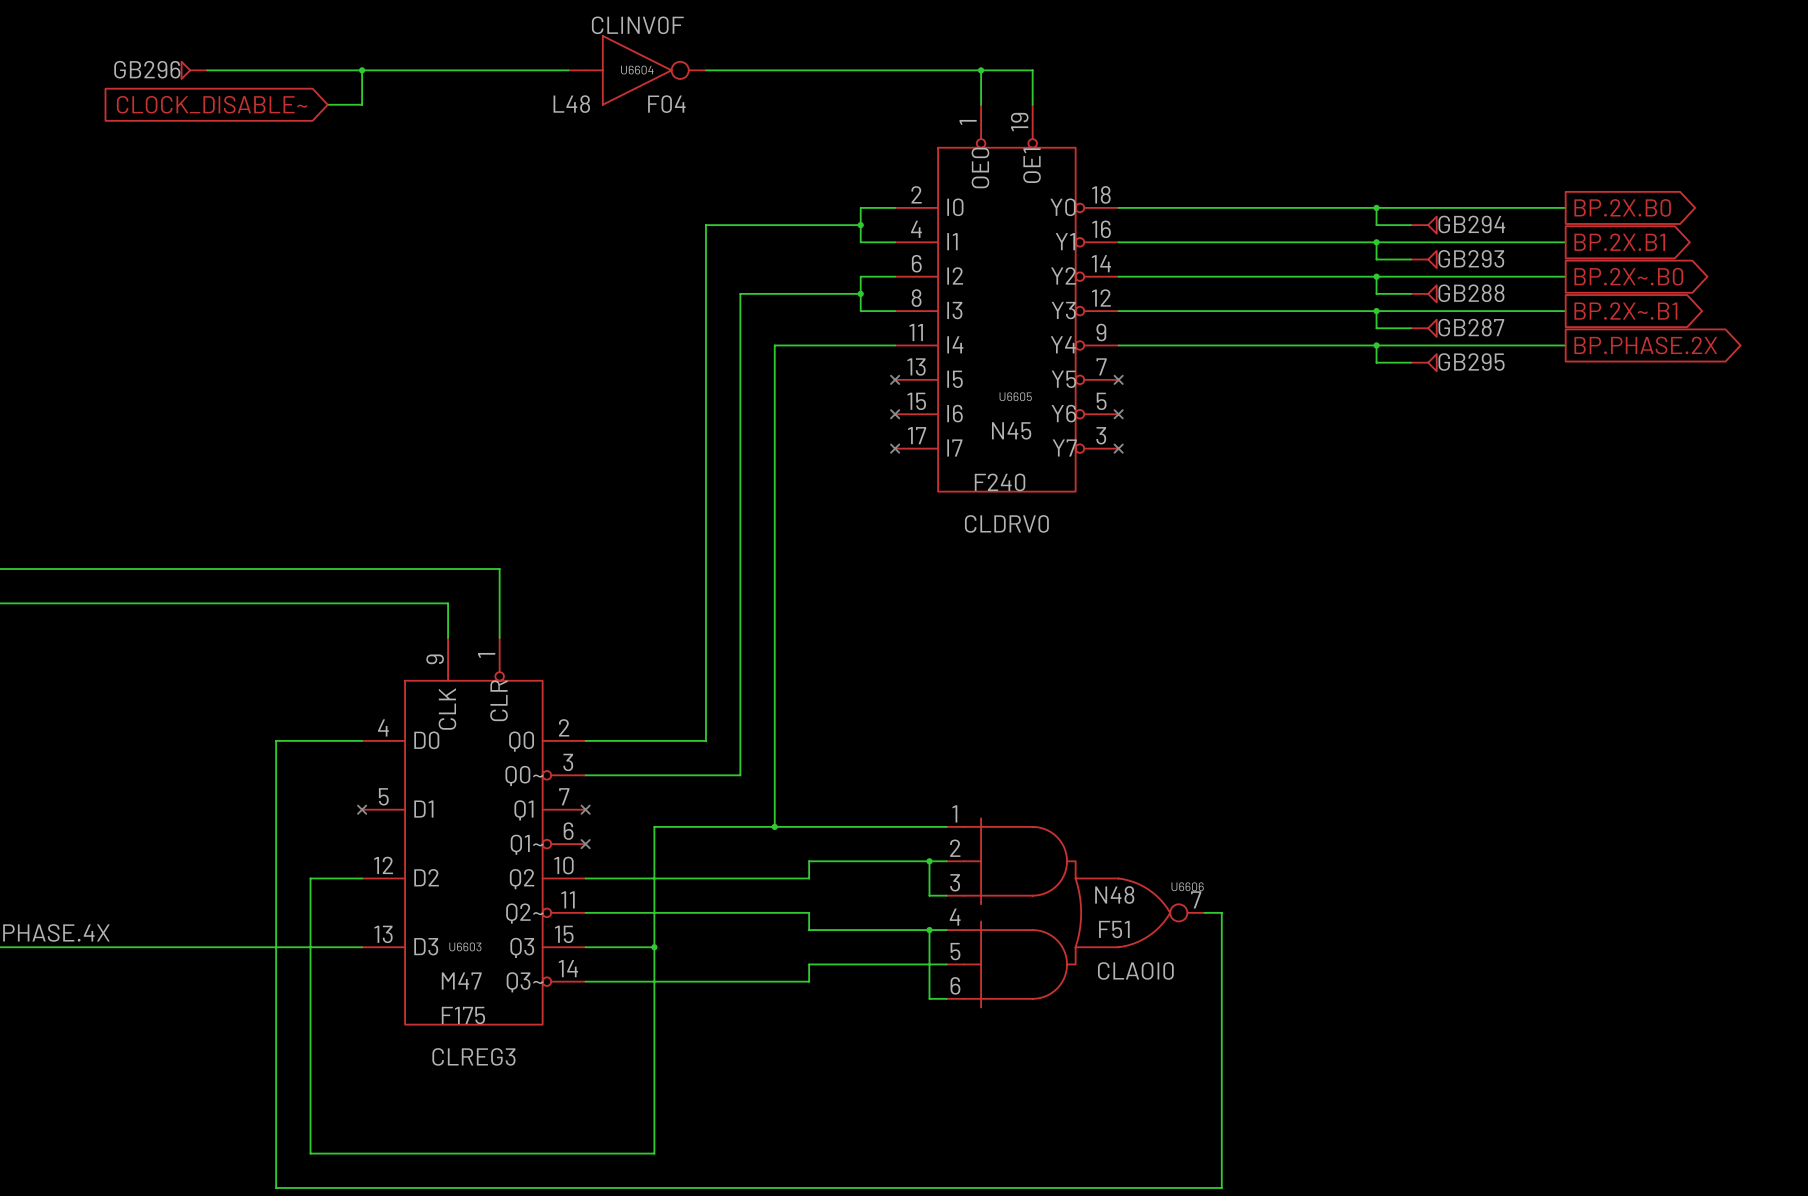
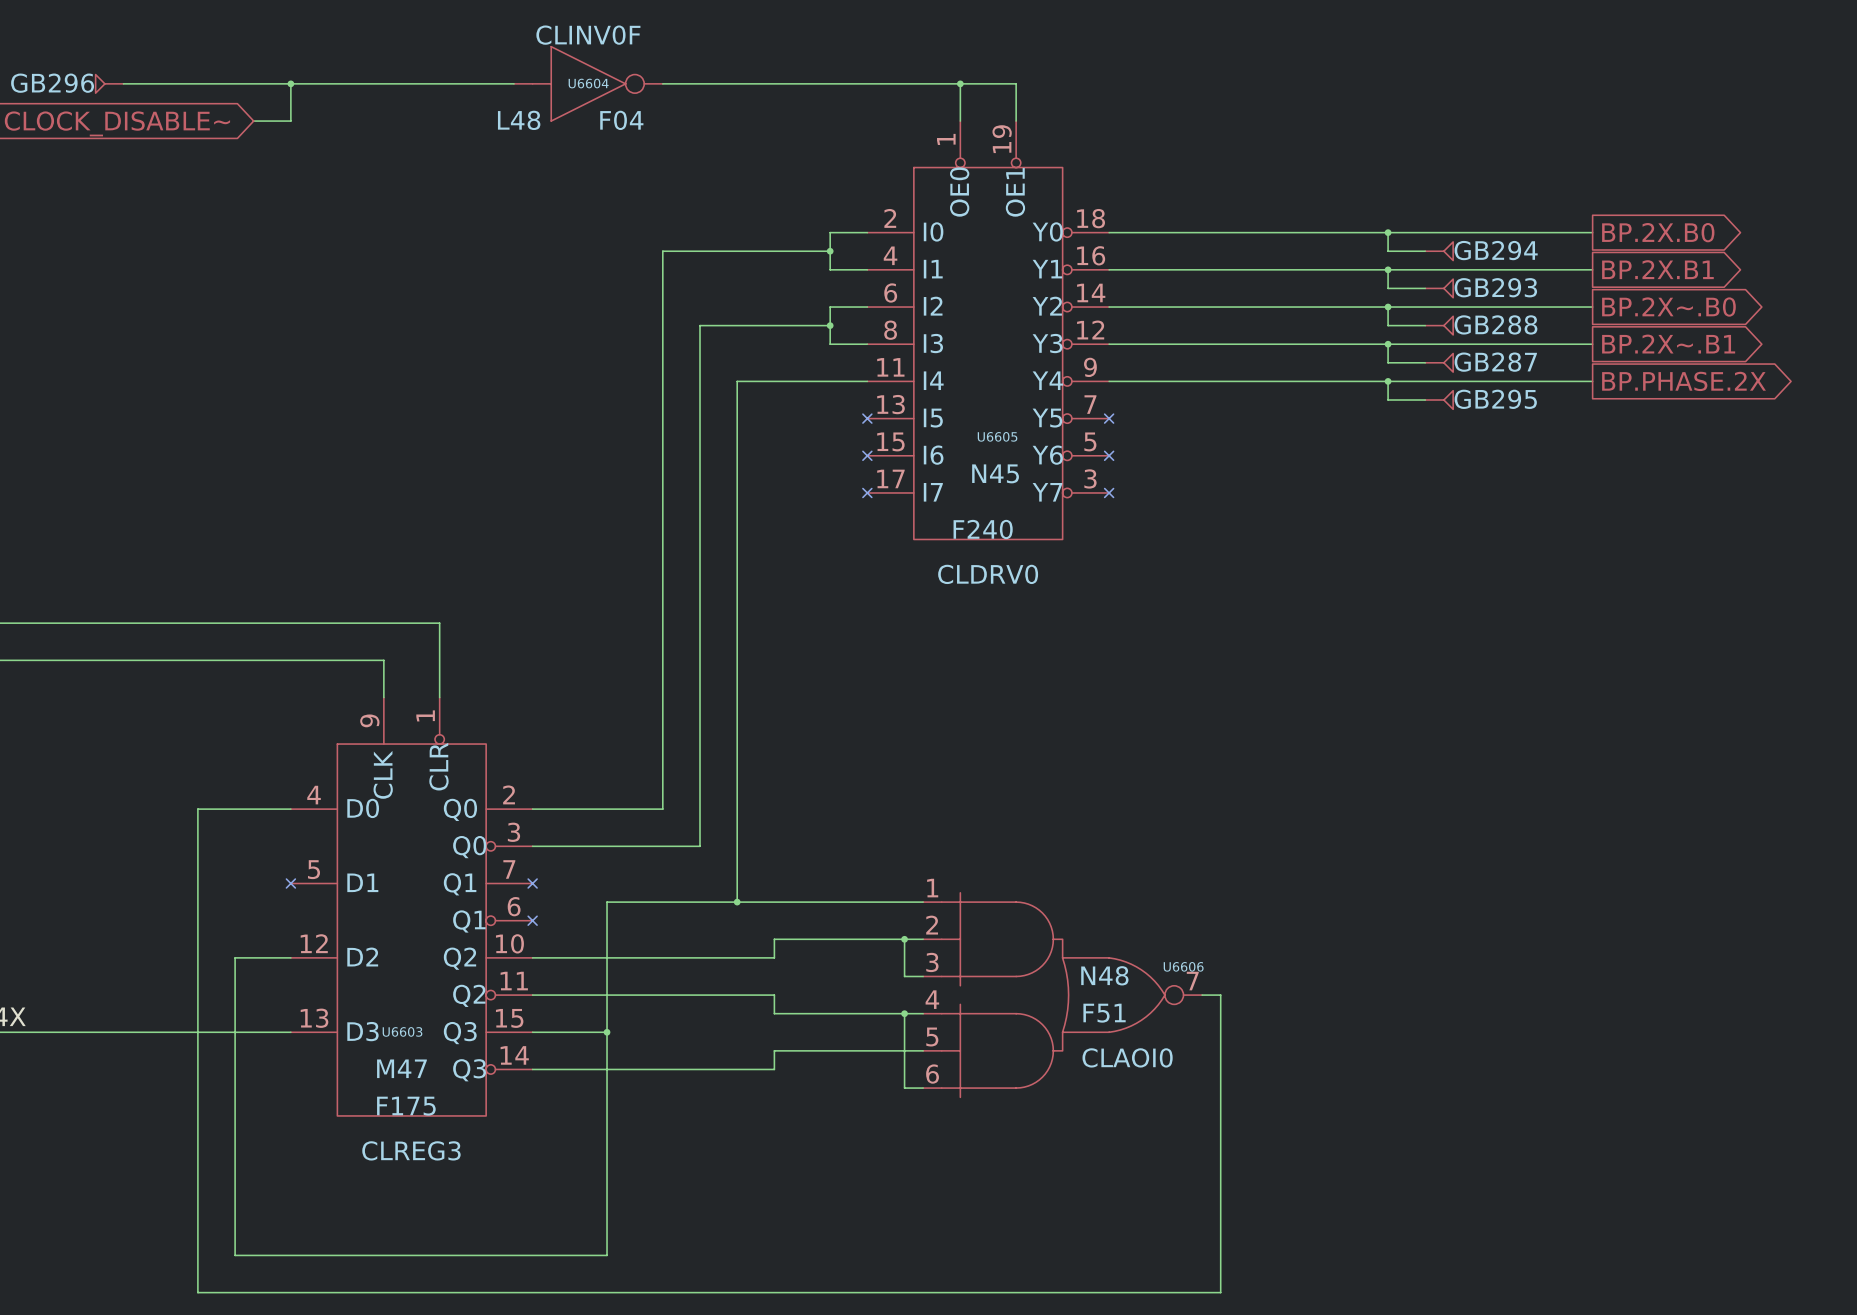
U6603 pin name: Q0~ (524, 775) -> Q0 (469, 847)
U6603 pin name: Q1~ (527, 844) -> Q1 (469, 921)
U6603 pin name: Q2~ (524, 913) -> Q2 (469, 995)
U6603 pin name: Q3~ (525, 982) -> Q3 (469, 1070)

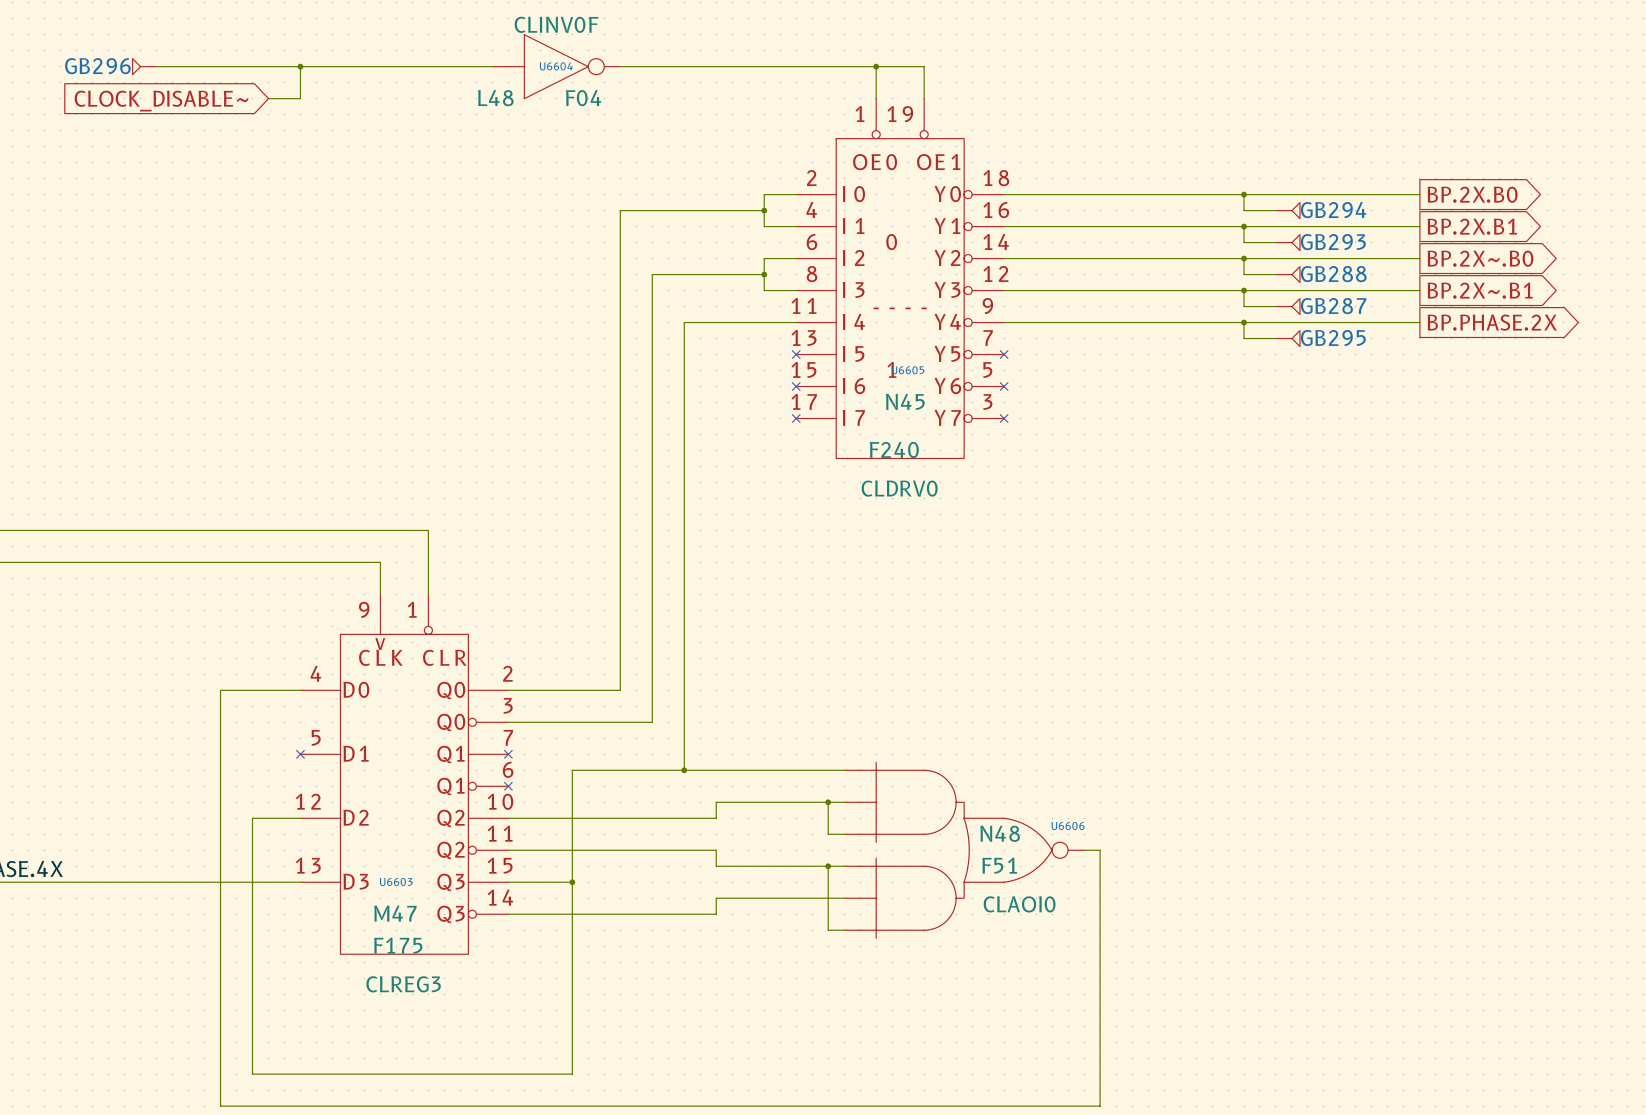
U6605 symbol: [867, 121, 1110, 540] -> [796, 98, 1005, 459]
U6603 symbol: [290, 697, 533, 1116] -> [300, 594, 509, 955]
U6606 pin number: 1 (932, 888) -> none
U6606 pin number: 2 (932, 925) -> none
U6606 pin number: 3 (932, 962) -> none
U6606 pin number: 7 (1192, 981) -> none
U6606 pin number: 4 (932, 999) -> none
U6606 pin number: 5 (932, 1037) -> none
U6606 pin number: 6 (932, 1074) -> none

